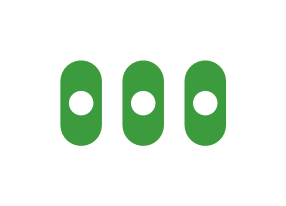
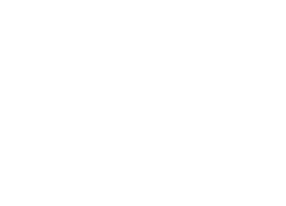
part: (143, 103) -> none

